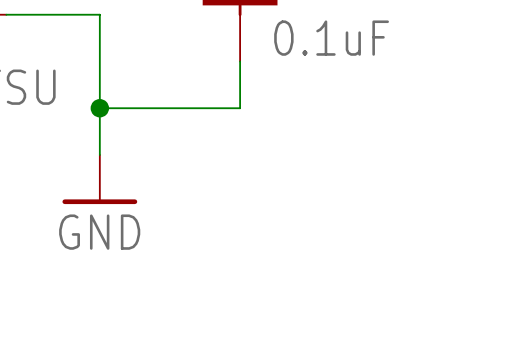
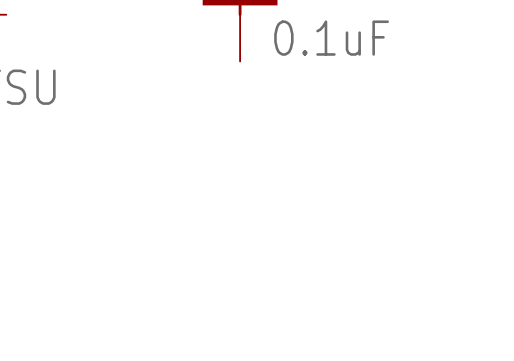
wire: (6, 14) (99, 14) (99, 154) -> none
wire: (240, 61) (240, 108) (99, 108) -> none
junction: (99, 108) -> none
power symbol: GND (99, 179) -> none

